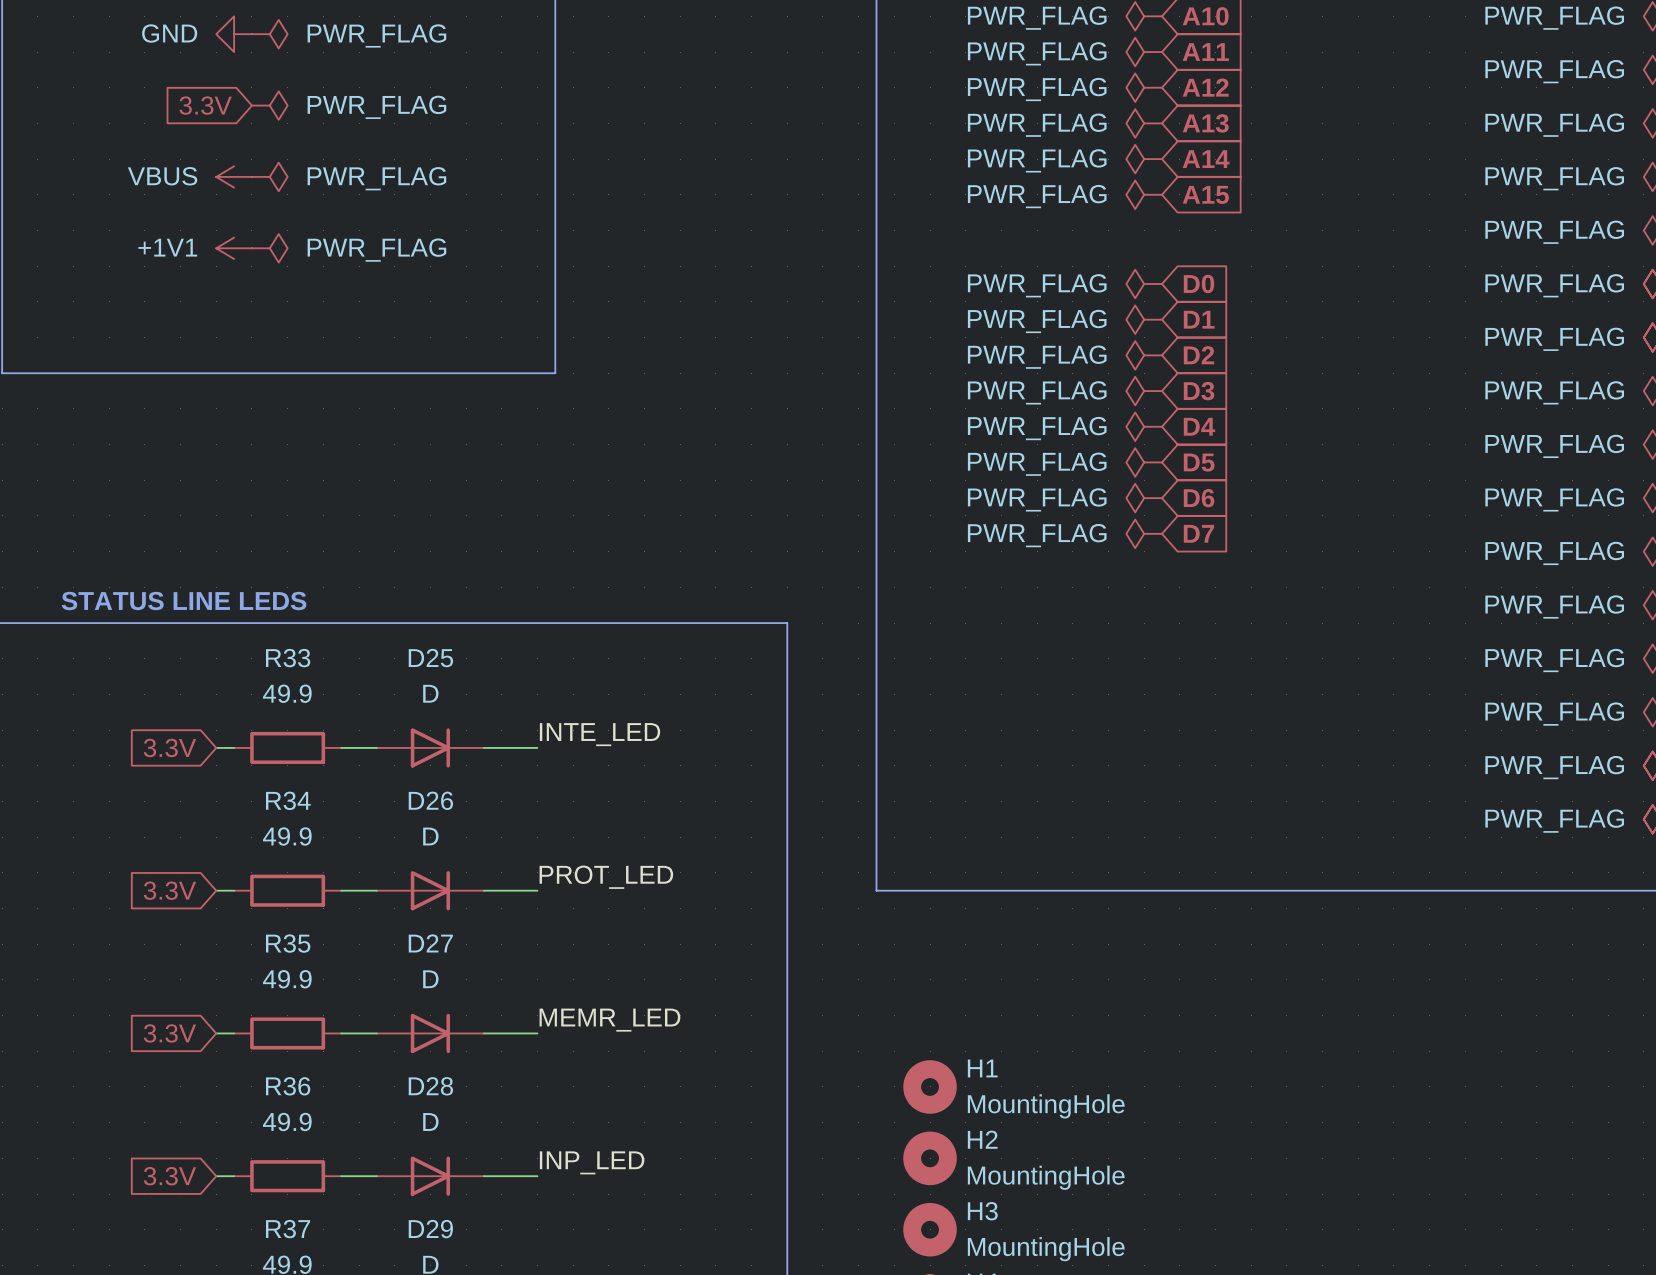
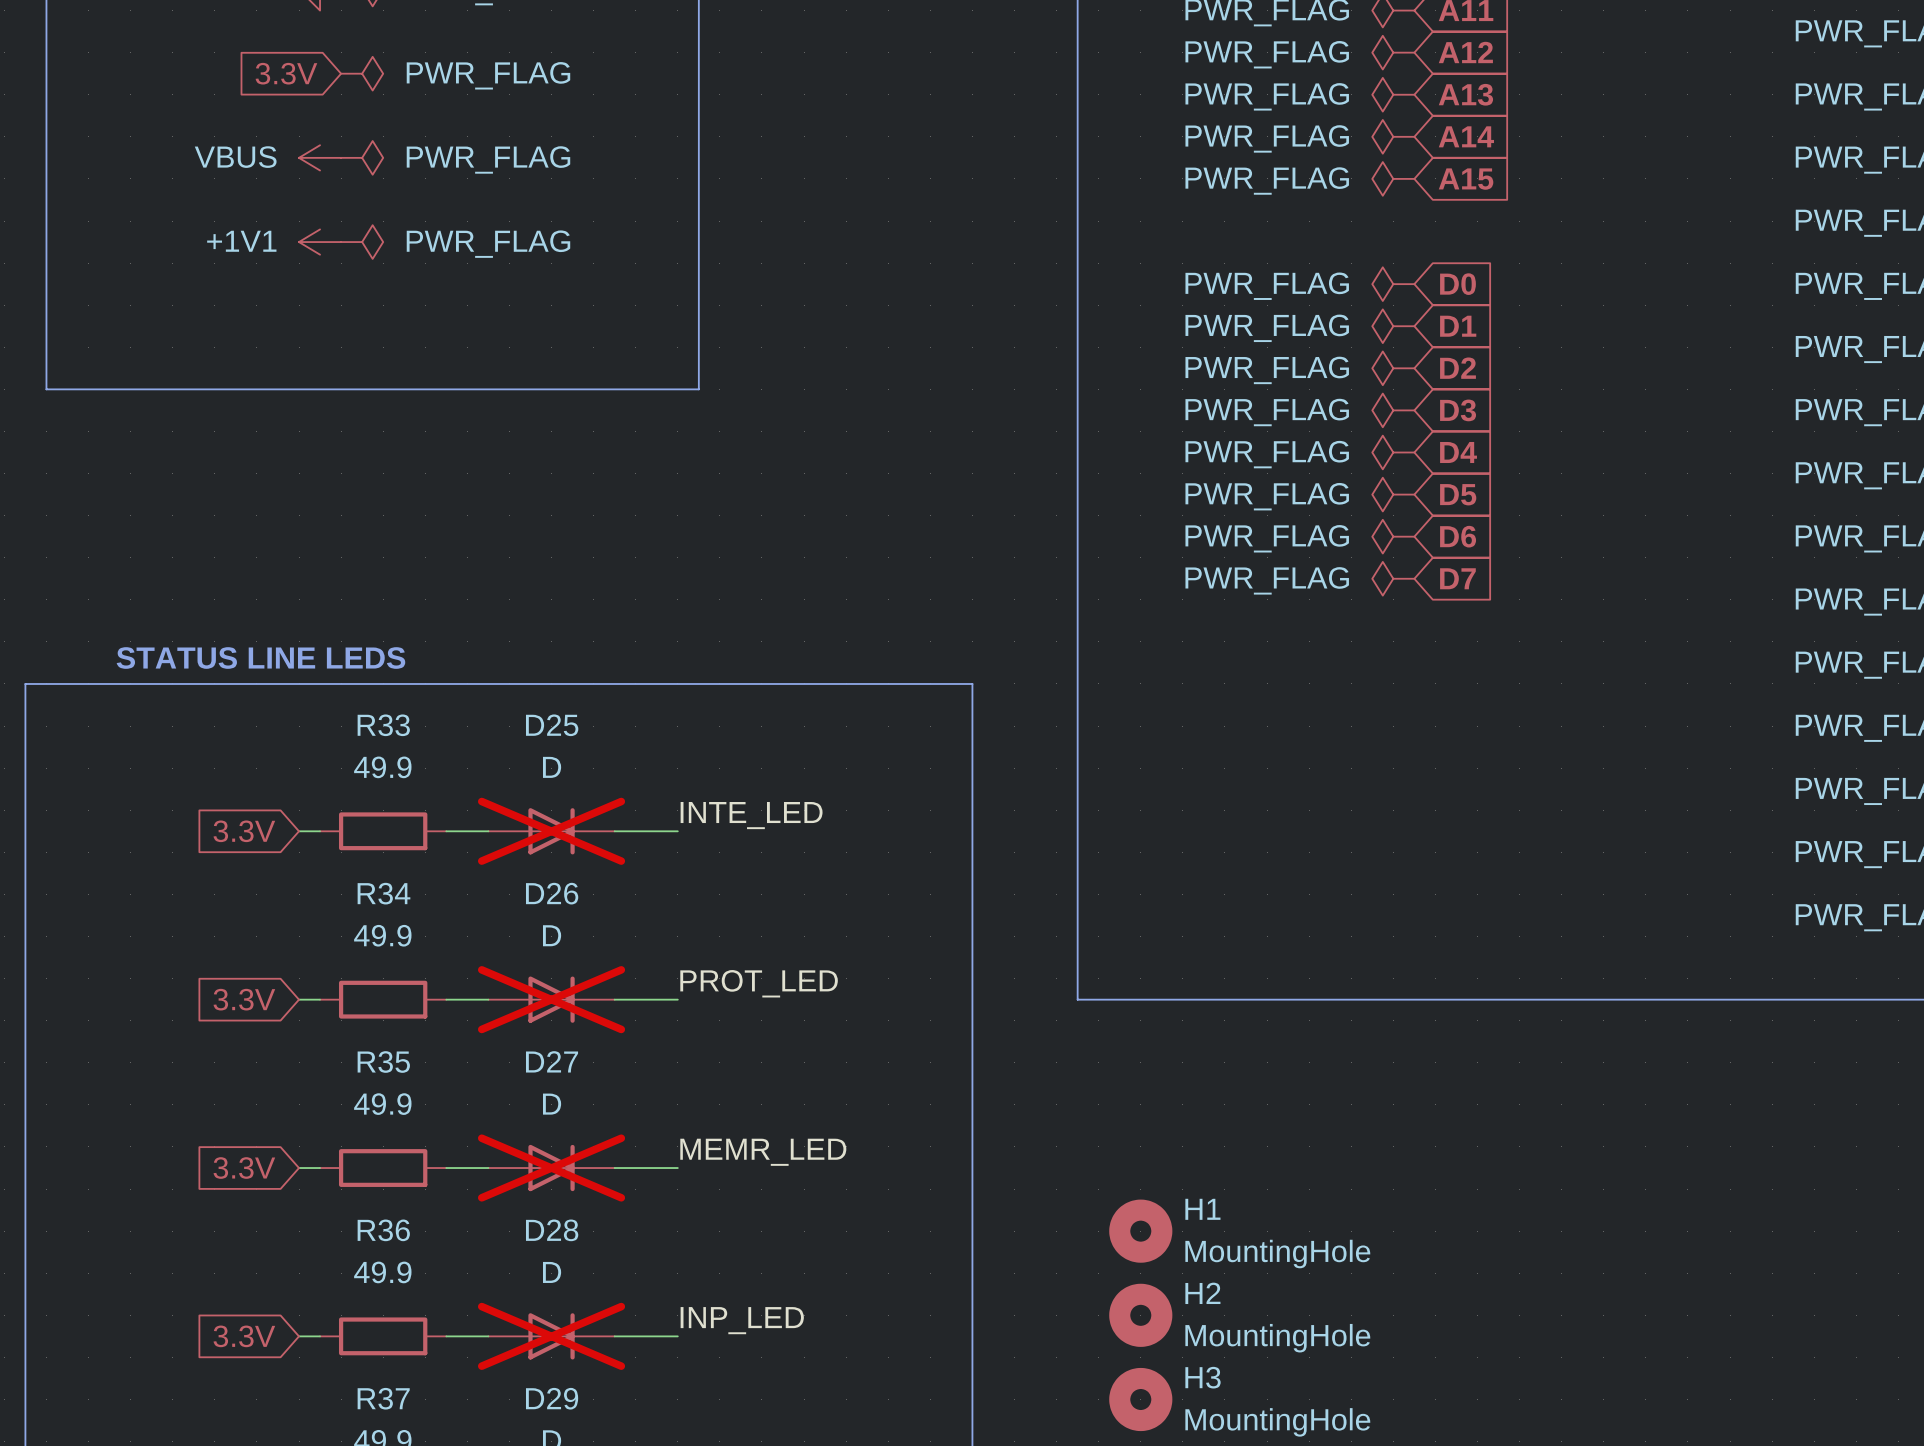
D25 do-not-place cross: none -> (551, 831)
D26 do-not-place cross: none -> (551, 999)
D27 do-not-place cross: none -> (551, 1168)
D28 do-not-place cross: none -> (551, 1336)

